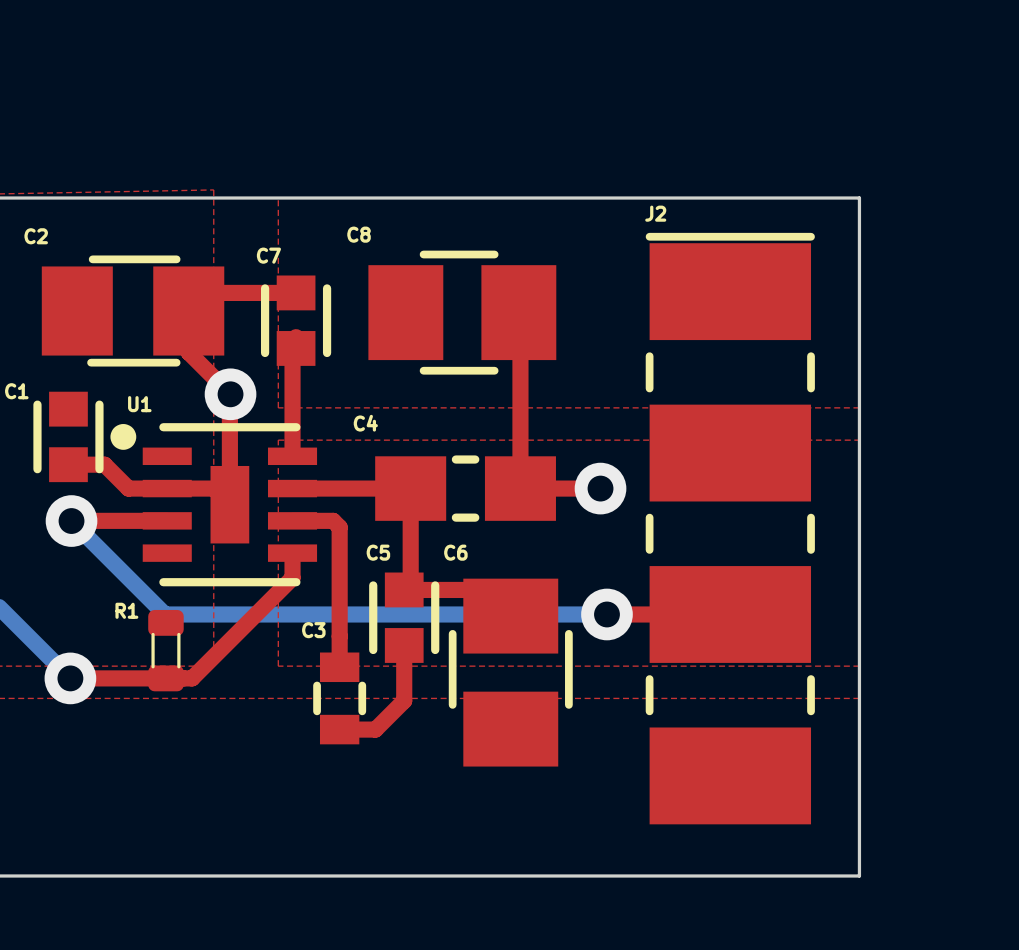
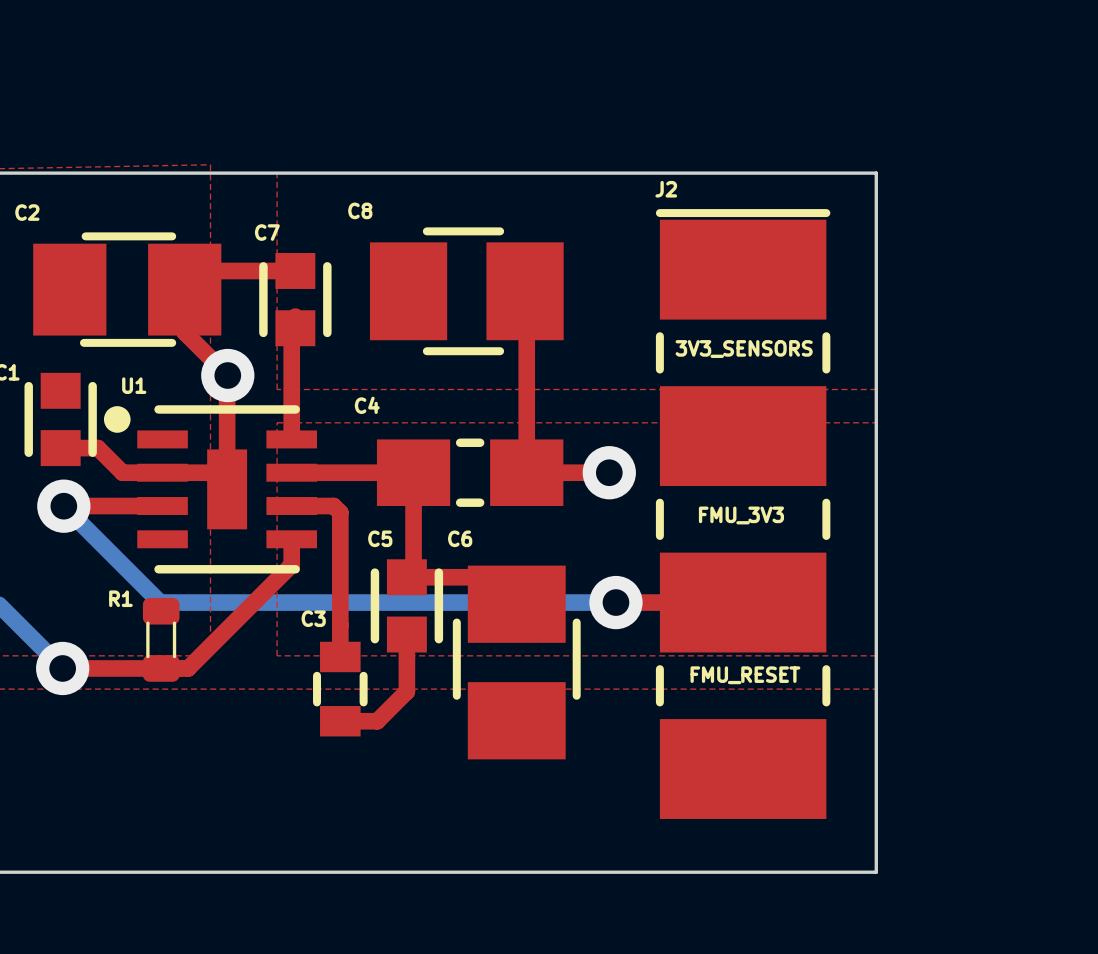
text: none -> 3V3_SENSORS (744, 349)
text: none -> FMU_3V3 (741, 515)
text: none -> FMU_RESET (745, 675)

